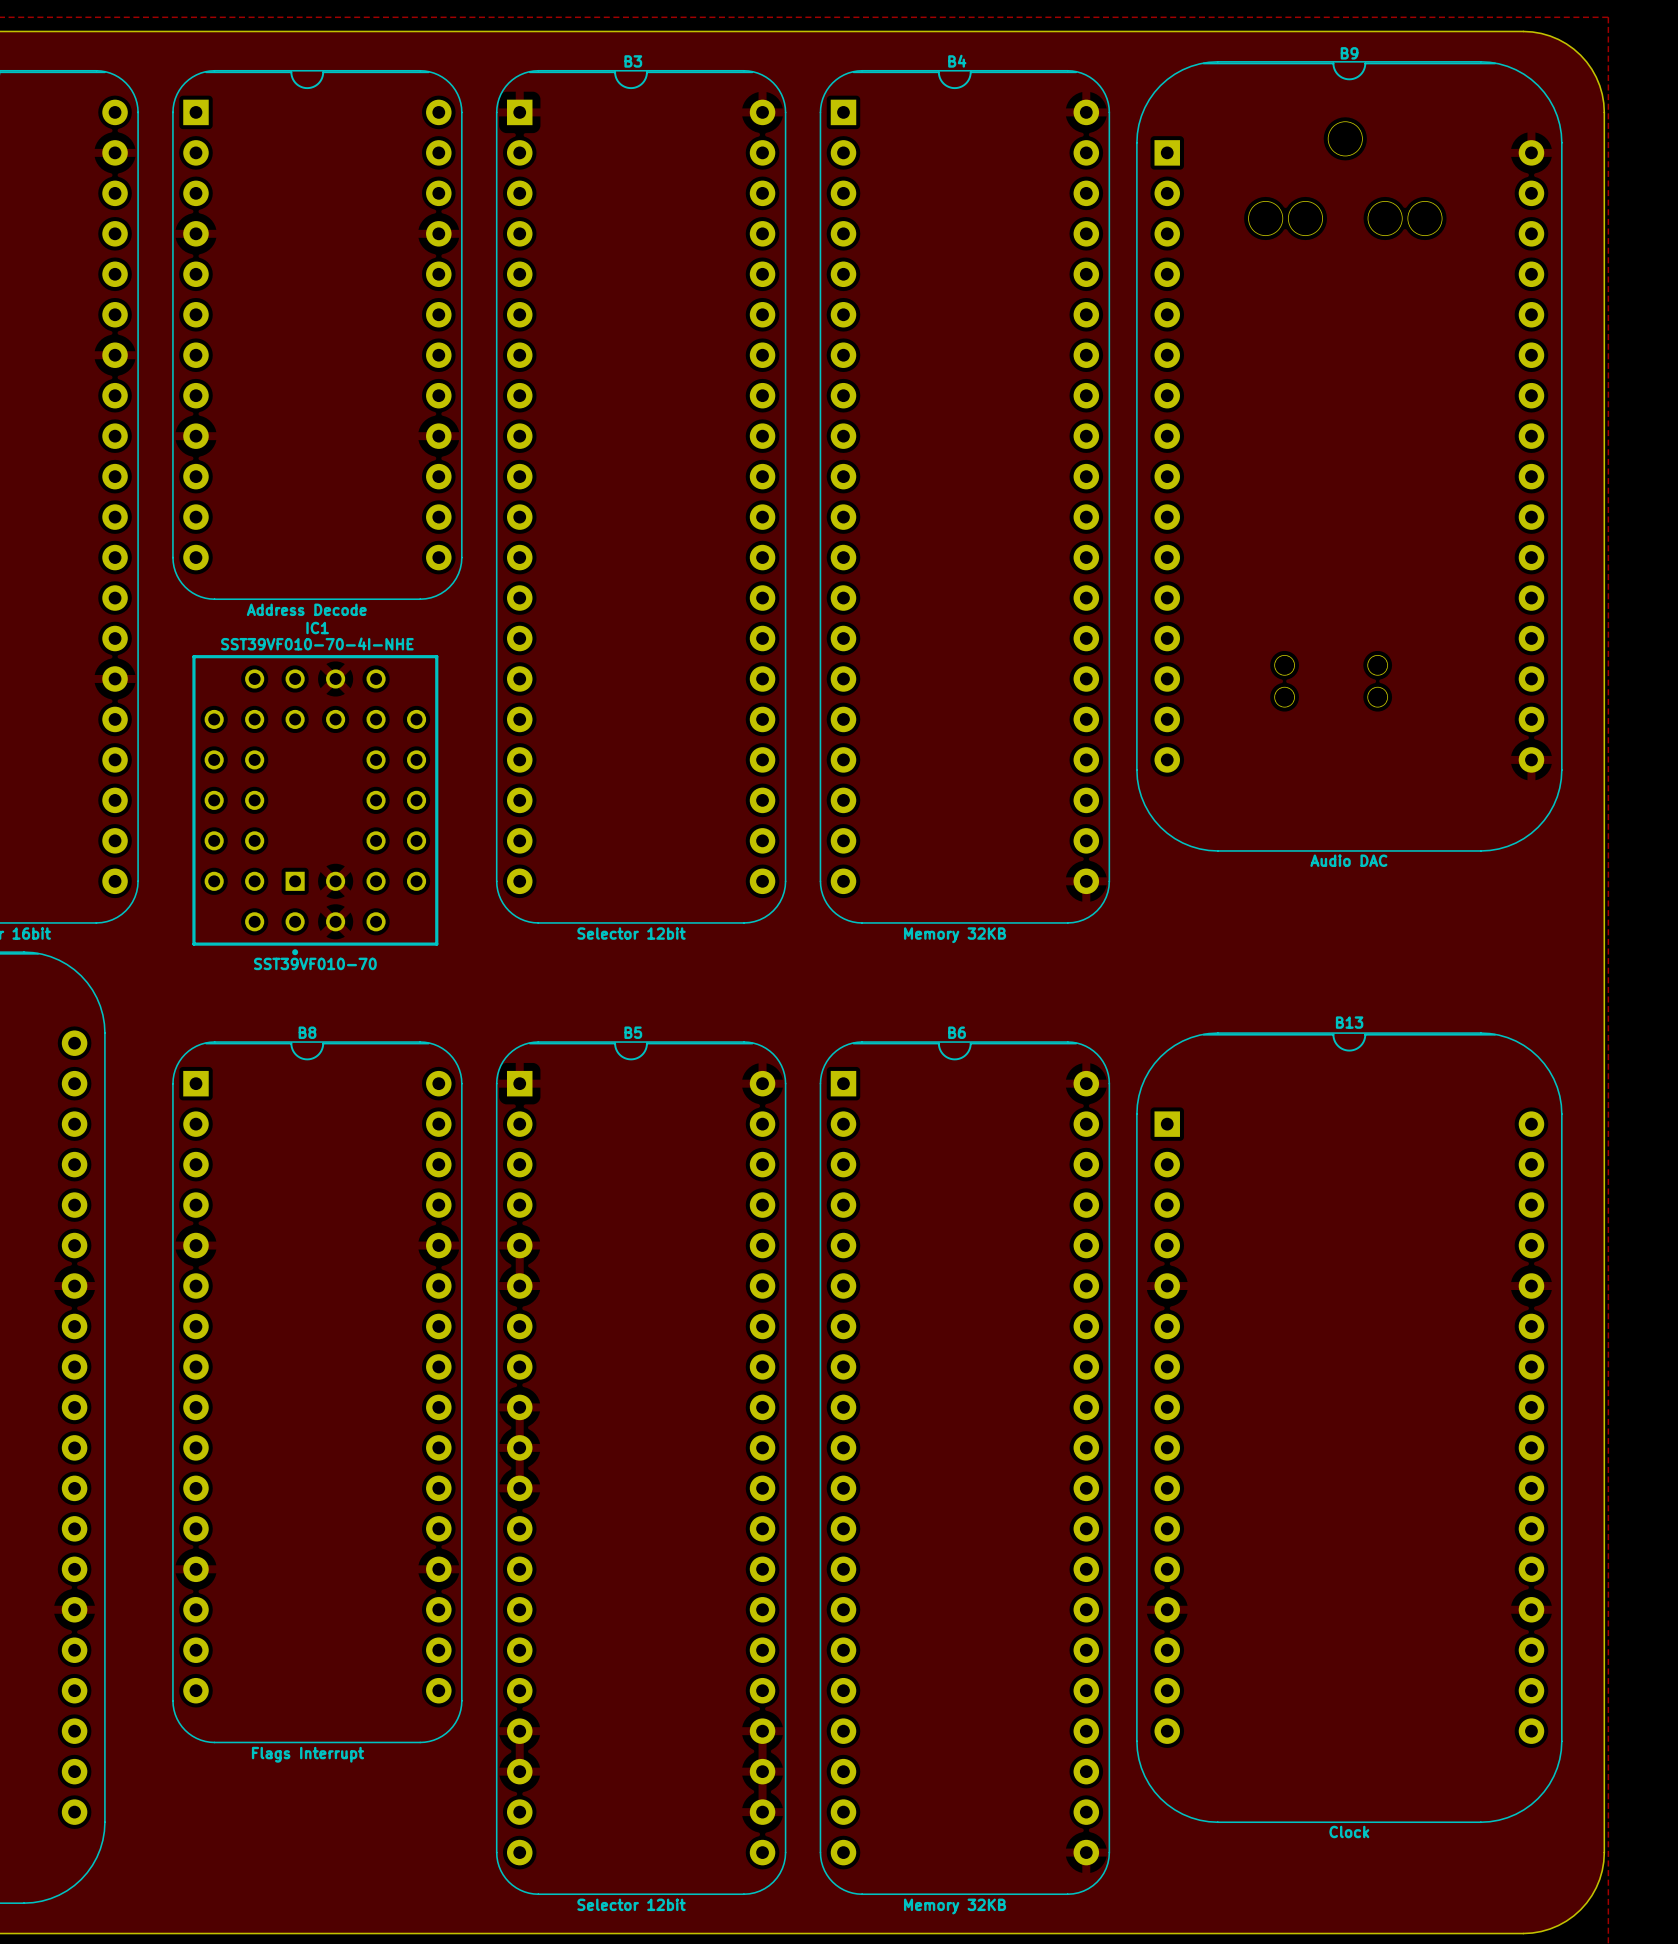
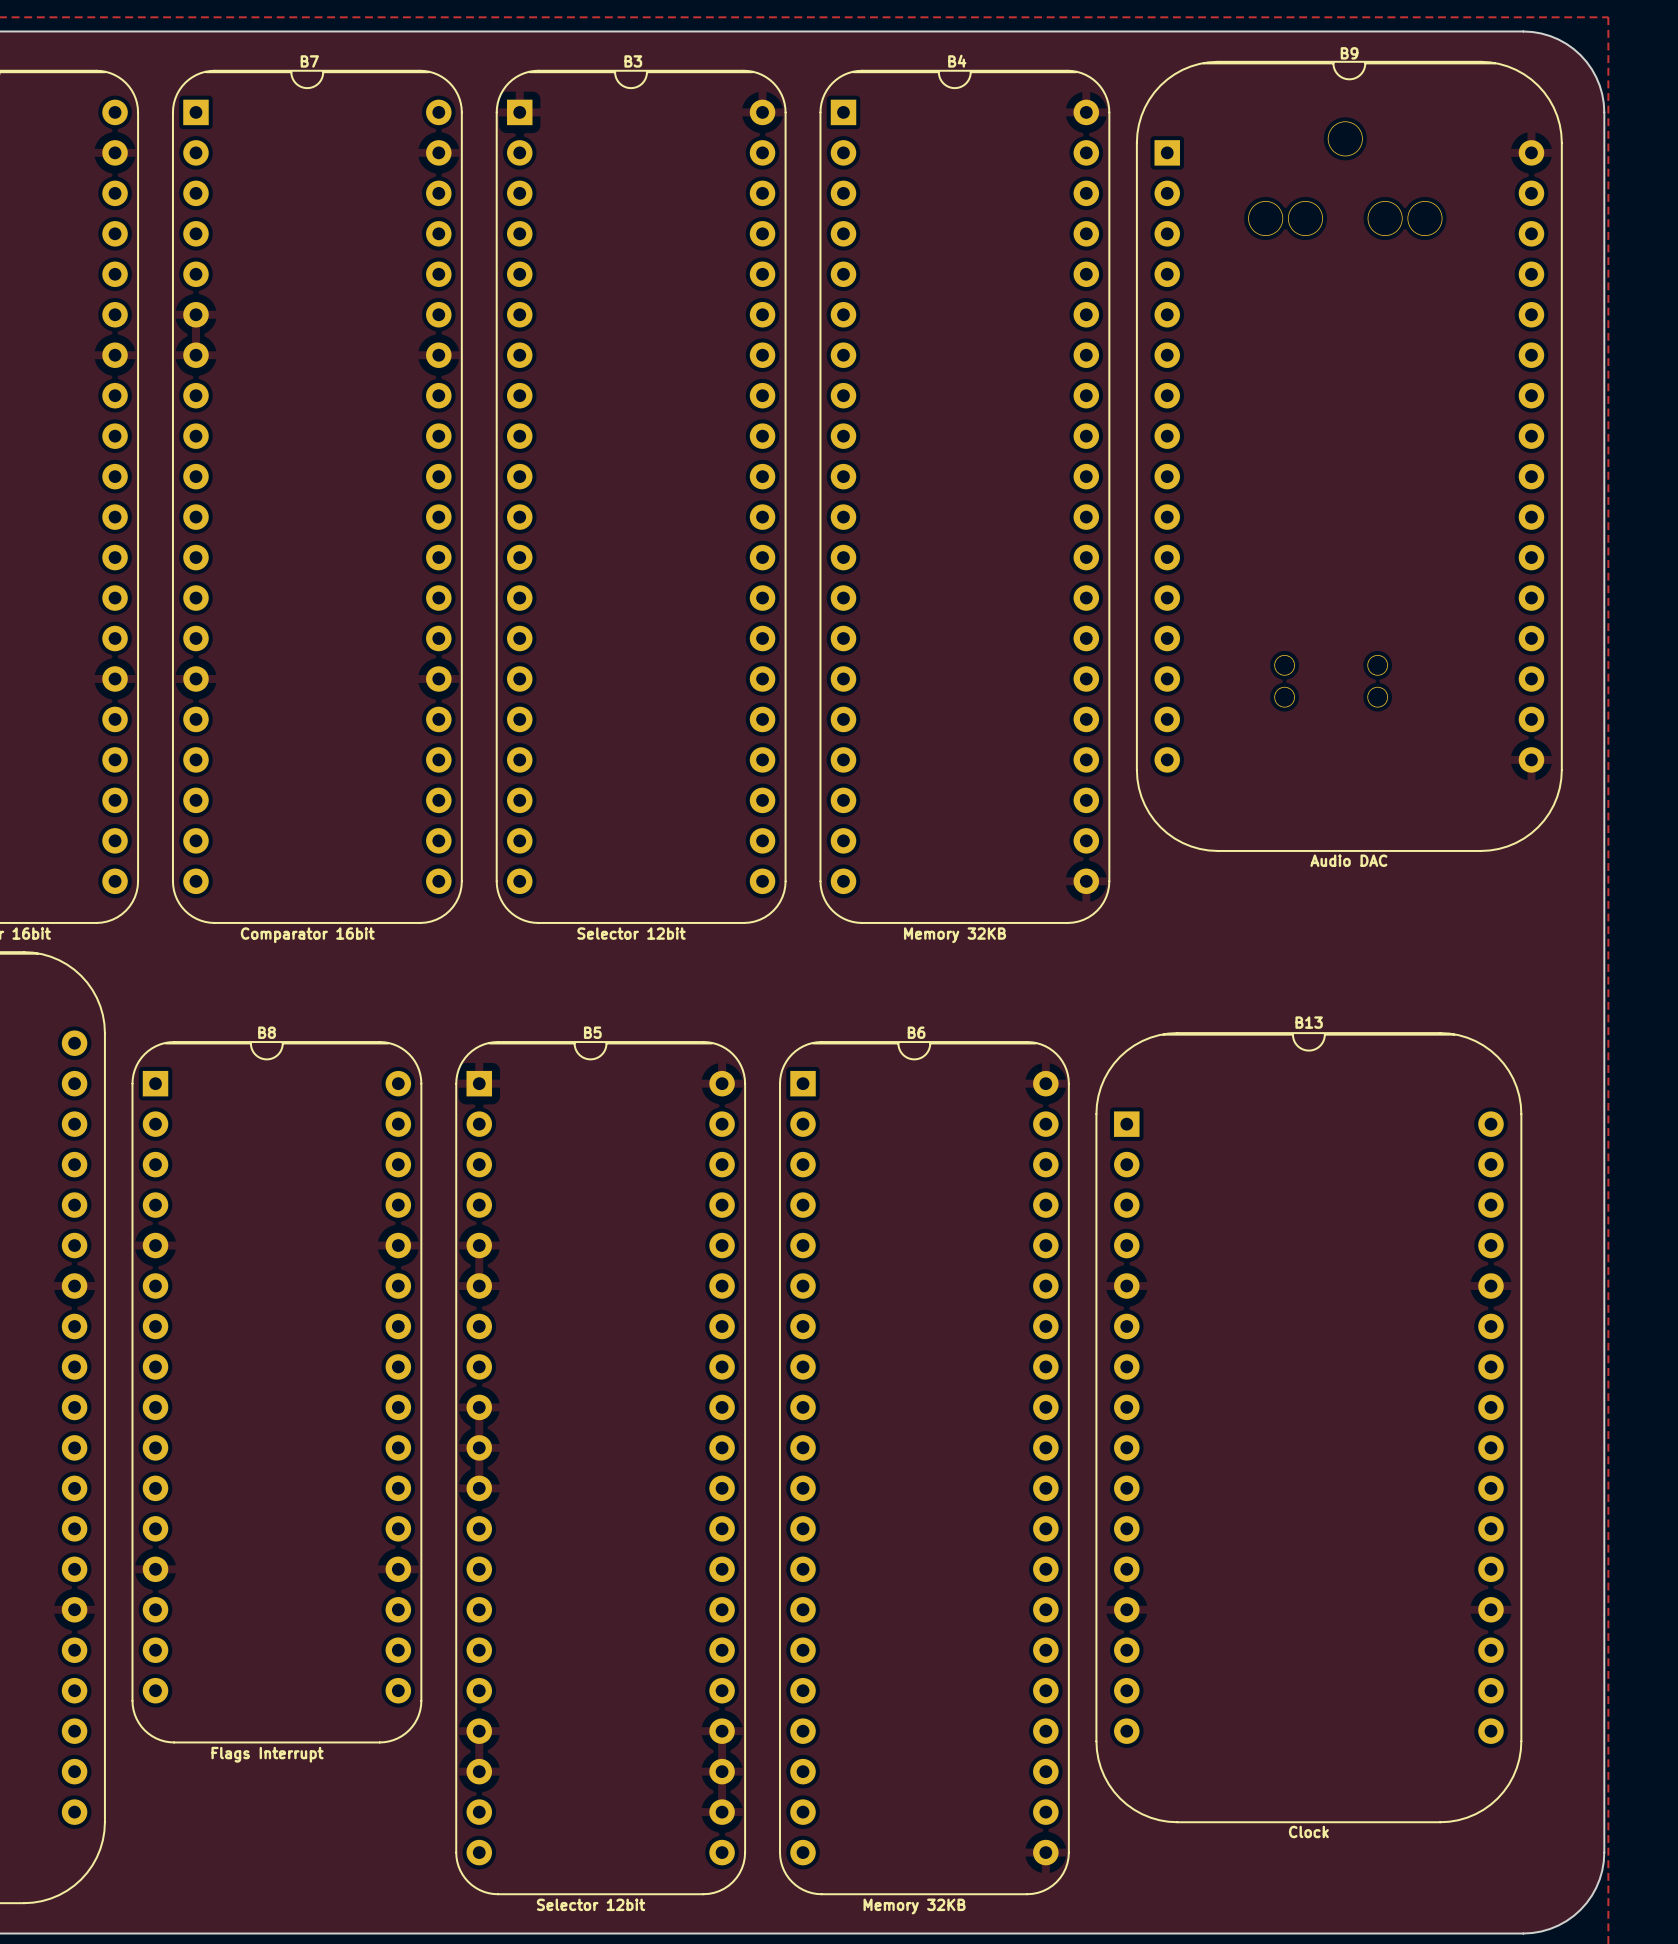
part: (317, 334) -> none
B7: none -> (317, 496)
IC1: SST39VF010-70-4I-NHE (315, 805) -> none
B8 position: (317, 1392) -> (276, 1392)
B13 position: (1349, 1427) -> (1308, 1427)
B5 position: (641, 1468) -> (600, 1468)
B6 position: (964, 1468) -> (924, 1468)

